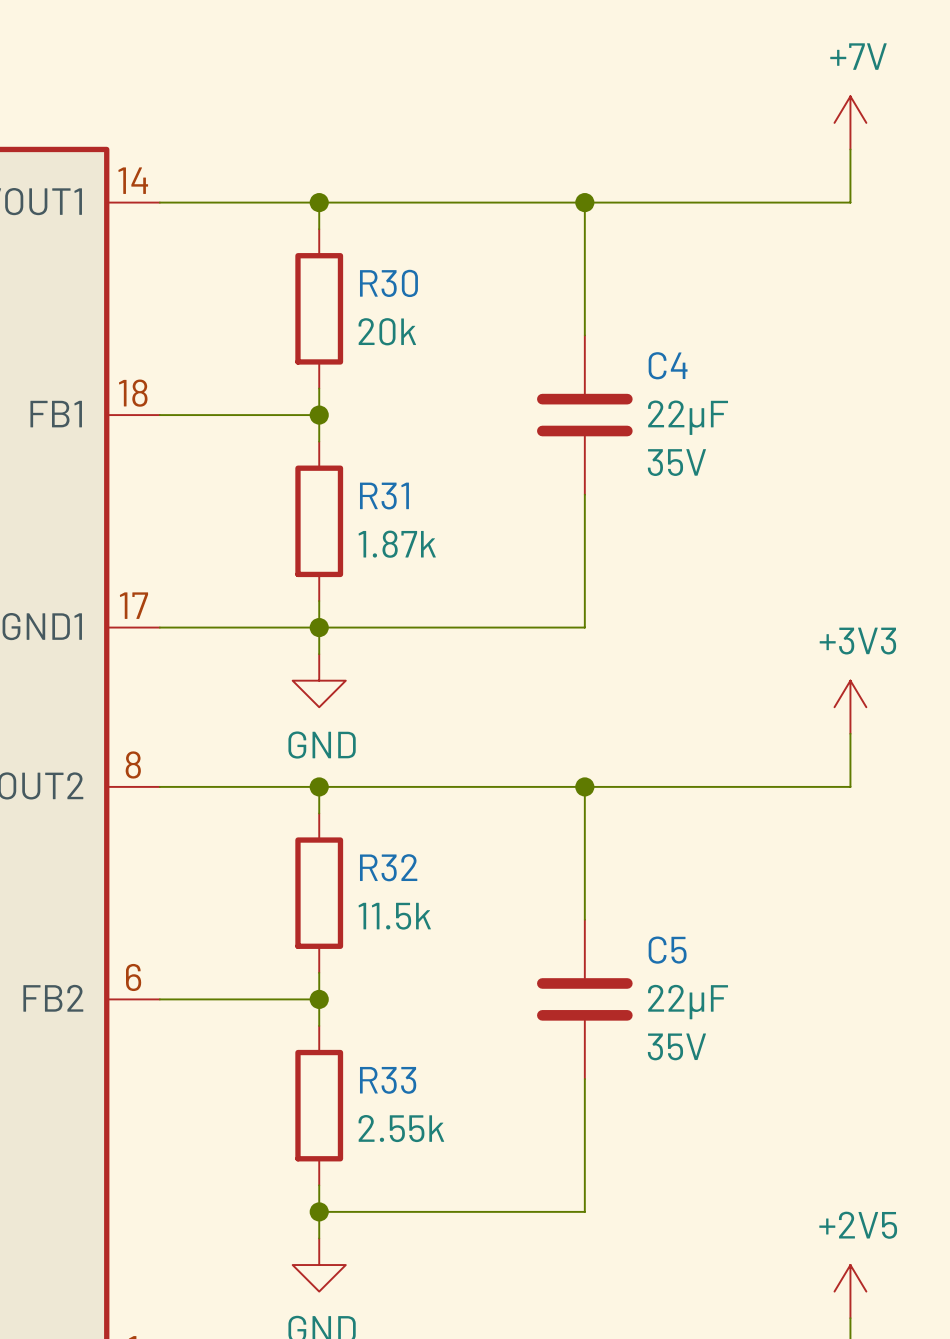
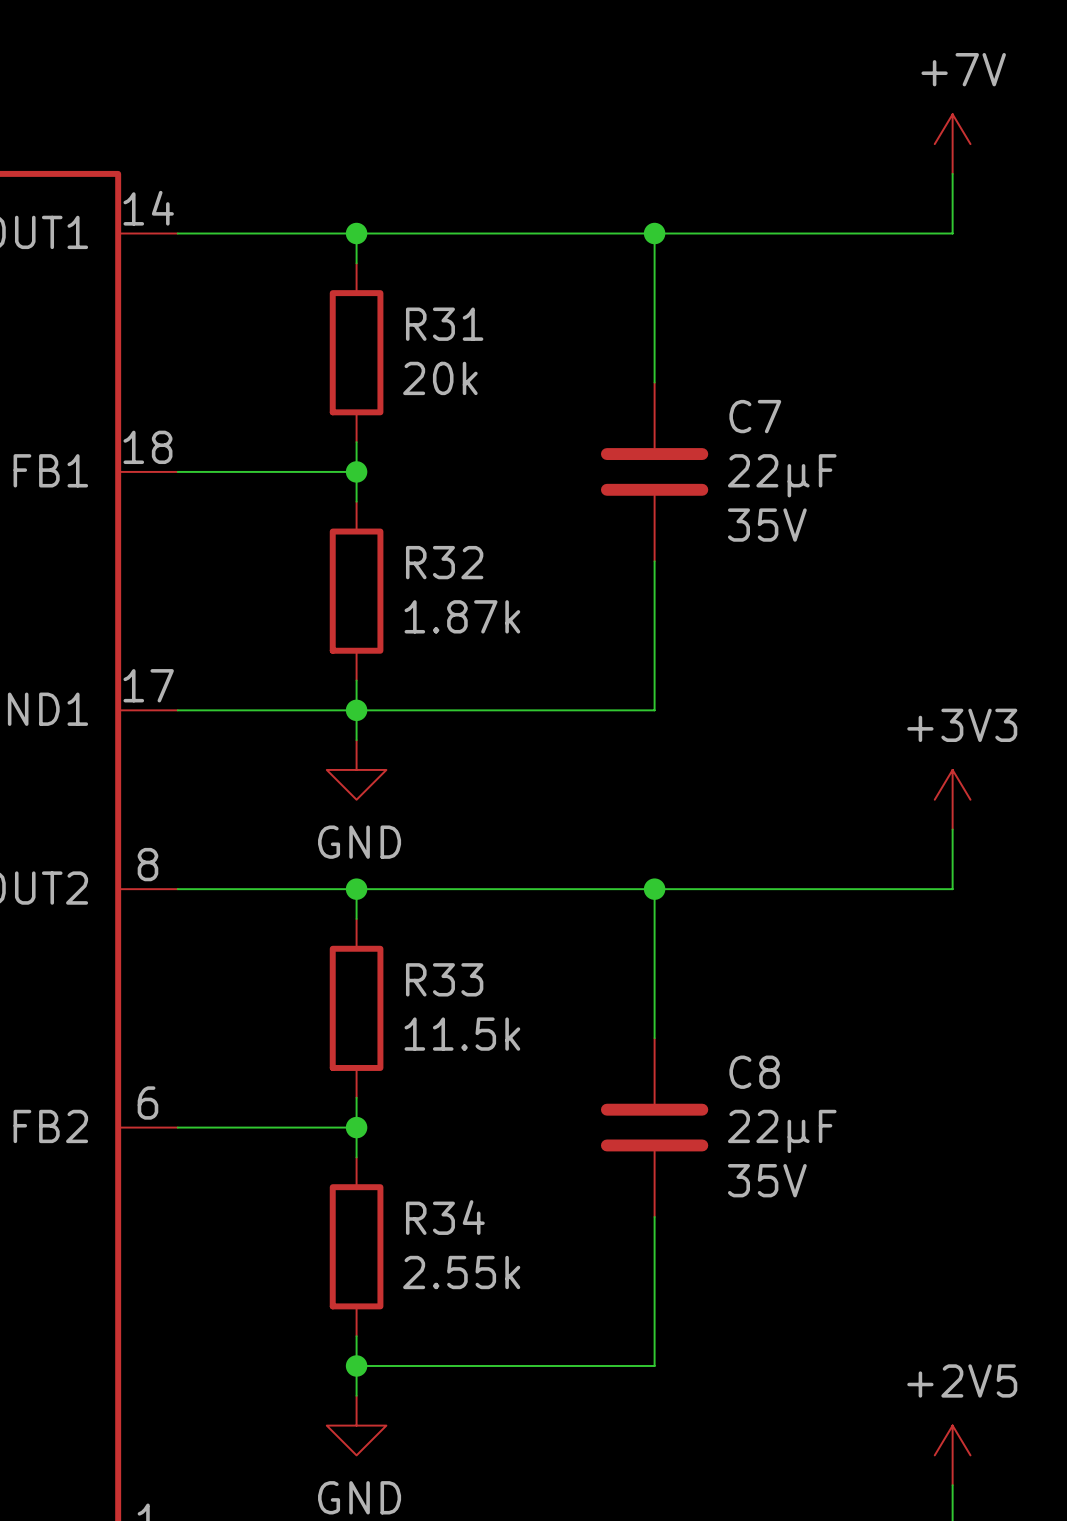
R30 name: R30 (388, 283) -> R31 (444, 324)
C4 name: C4 (668, 365) -> C7 (755, 416)
R31 name: R31 (384, 496) -> R32 (444, 562)
R32 name: R32 (388, 867) -> R33 (444, 979)
C5 name: C5 (667, 950) -> C8 (754, 1072)
R33 name: R33 (388, 1080) -> R34 (445, 1217)

